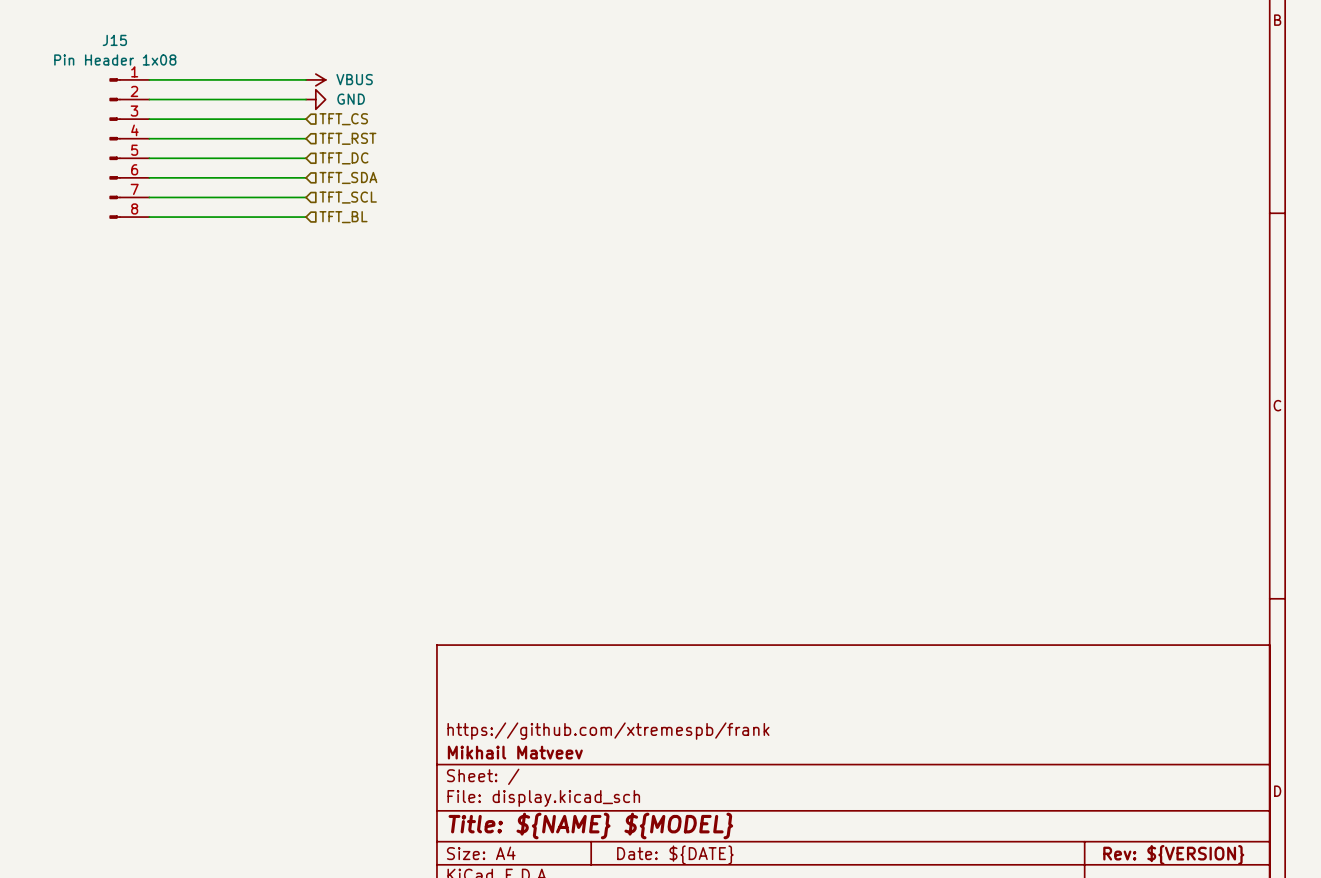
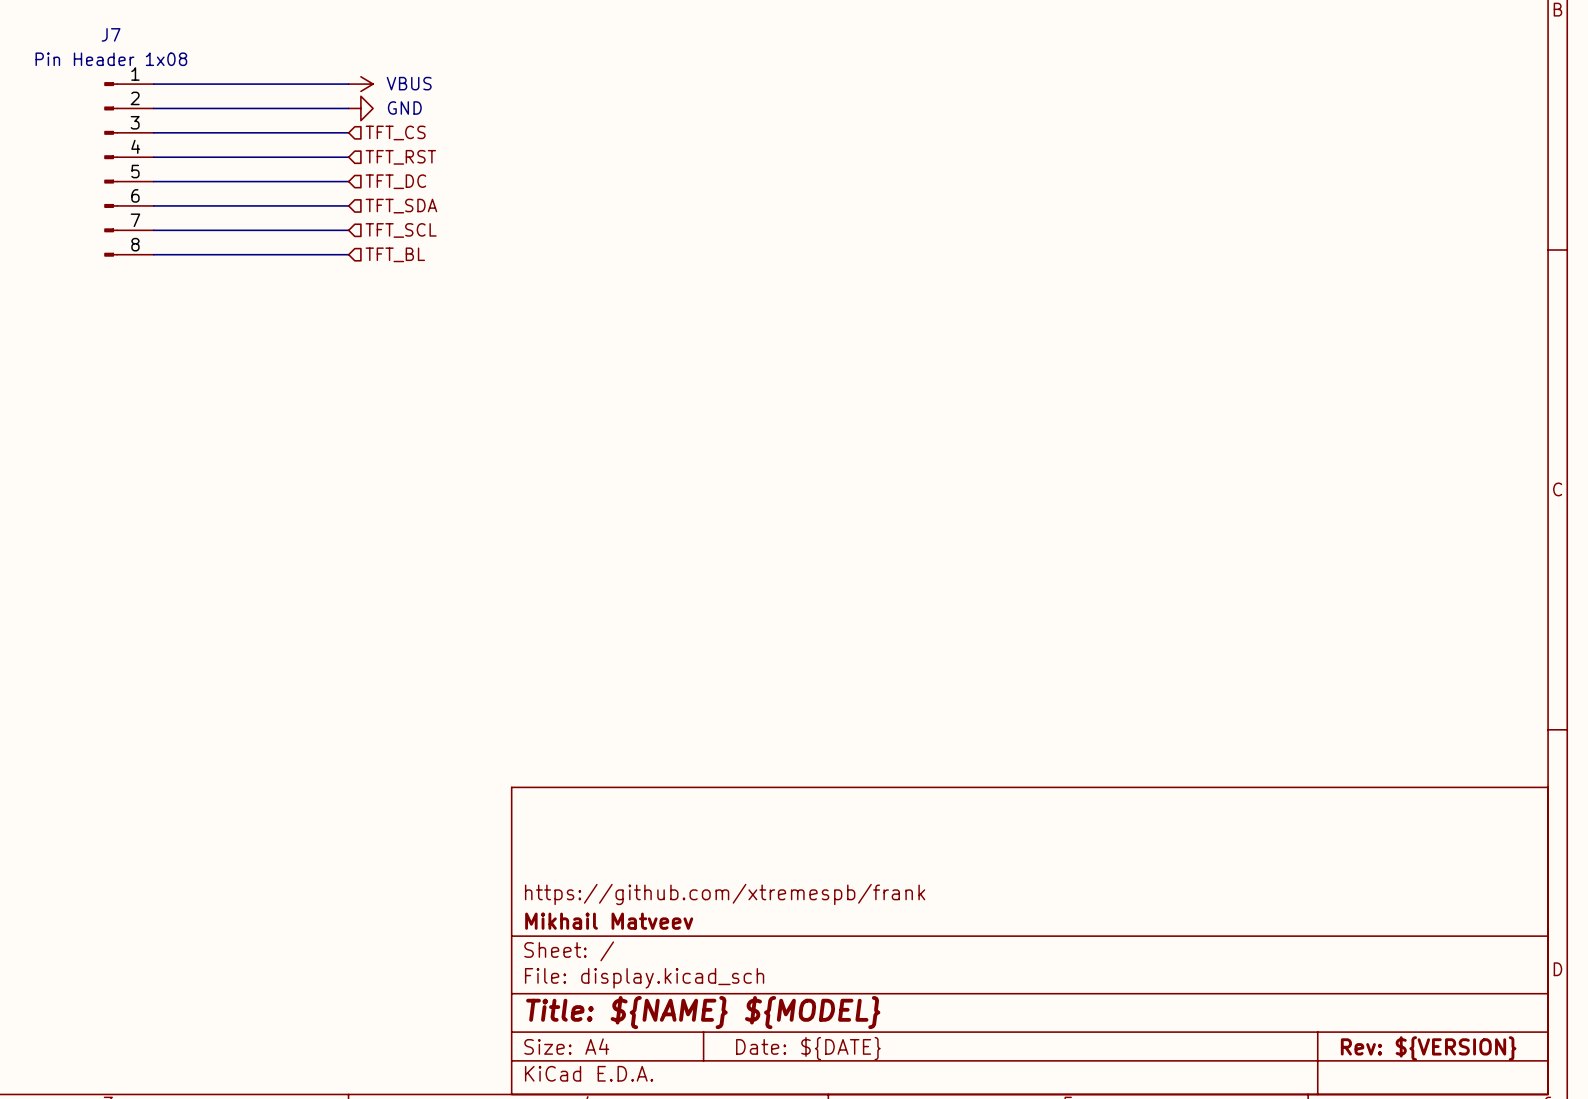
J15 name: J15 (114, 40) -> J7 (111, 34)

